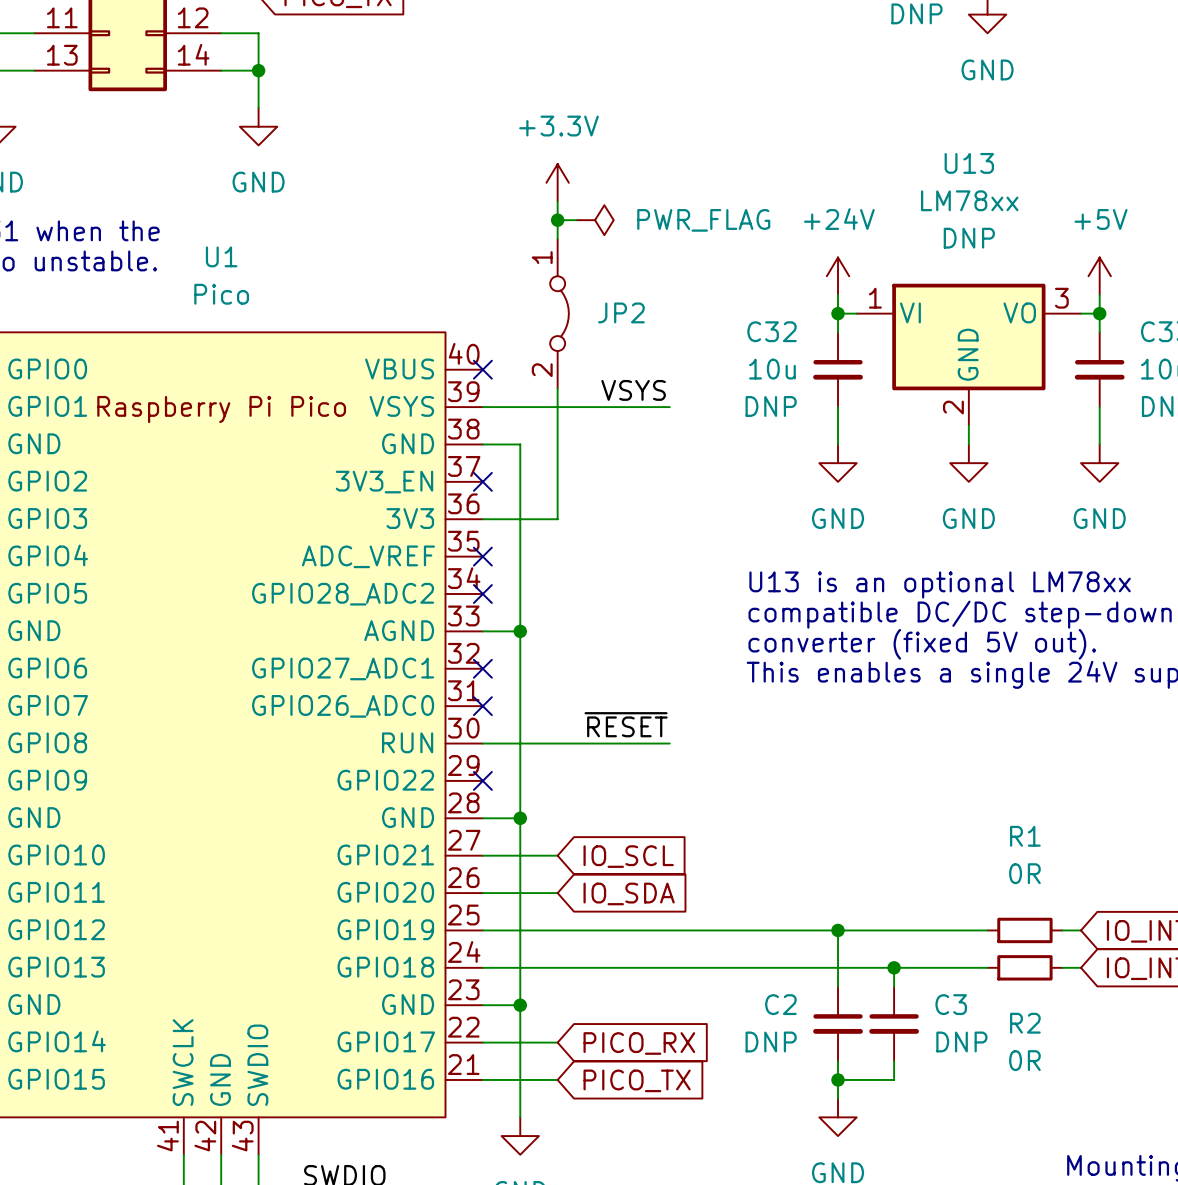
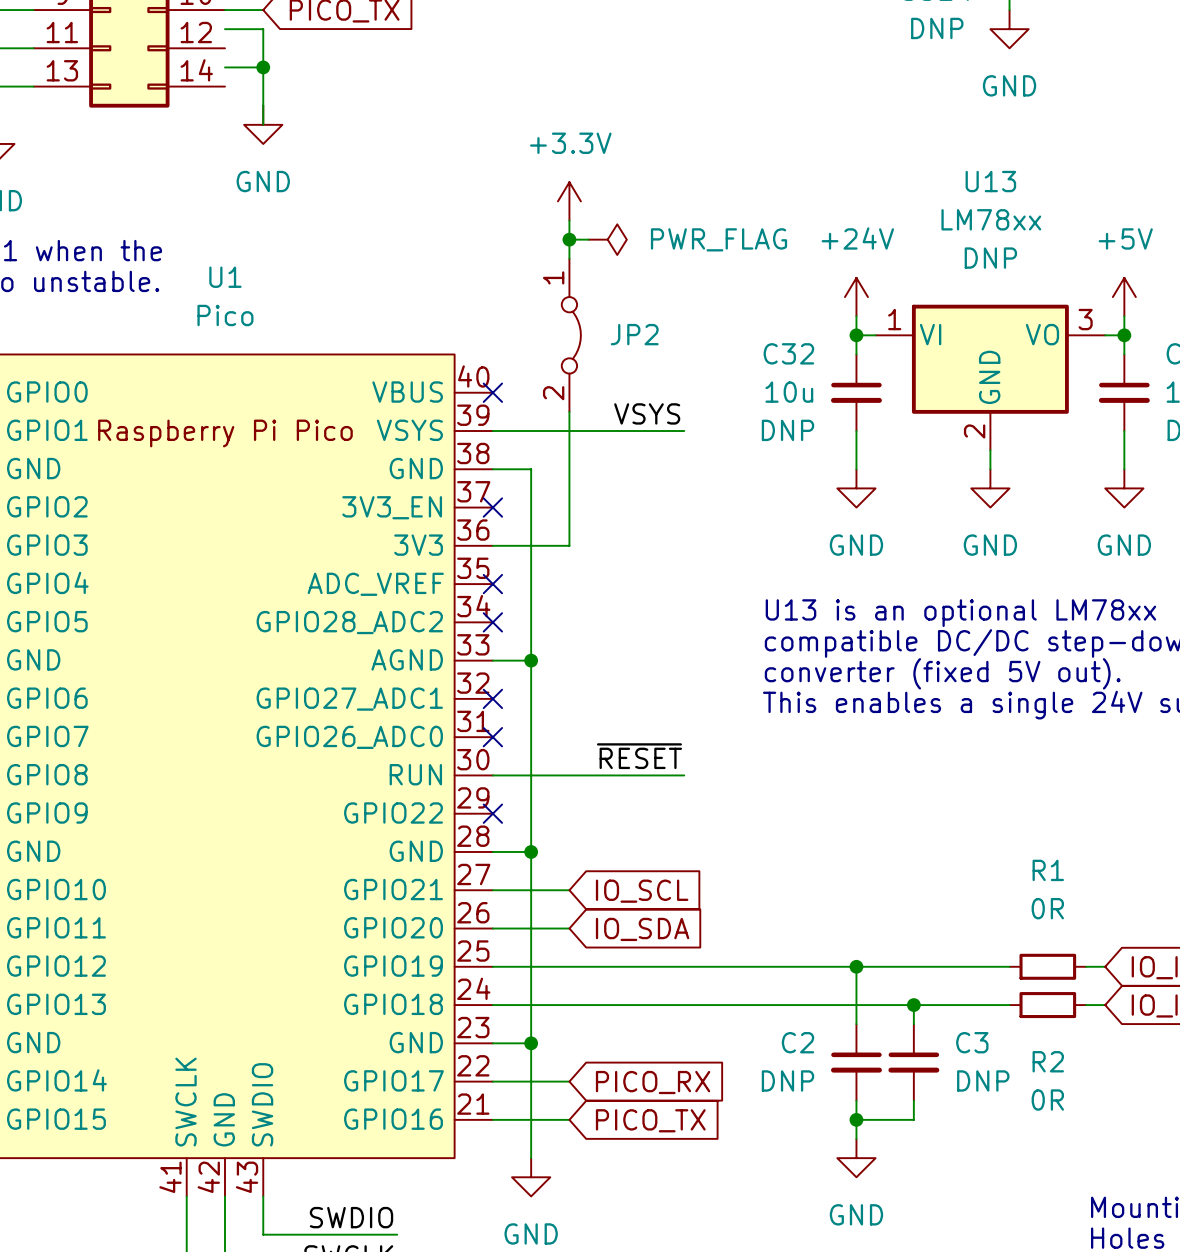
wire: (221, 33) (258, 33) -> (224, 29) (263, 29) (263, 48)
wire: (221, 70) (258, 70) -> (224, 67) (263, 67)
junction position: (258, 70) -> (263, 67)
power symbol position: GND (258, 126) -> GND (263, 124)

